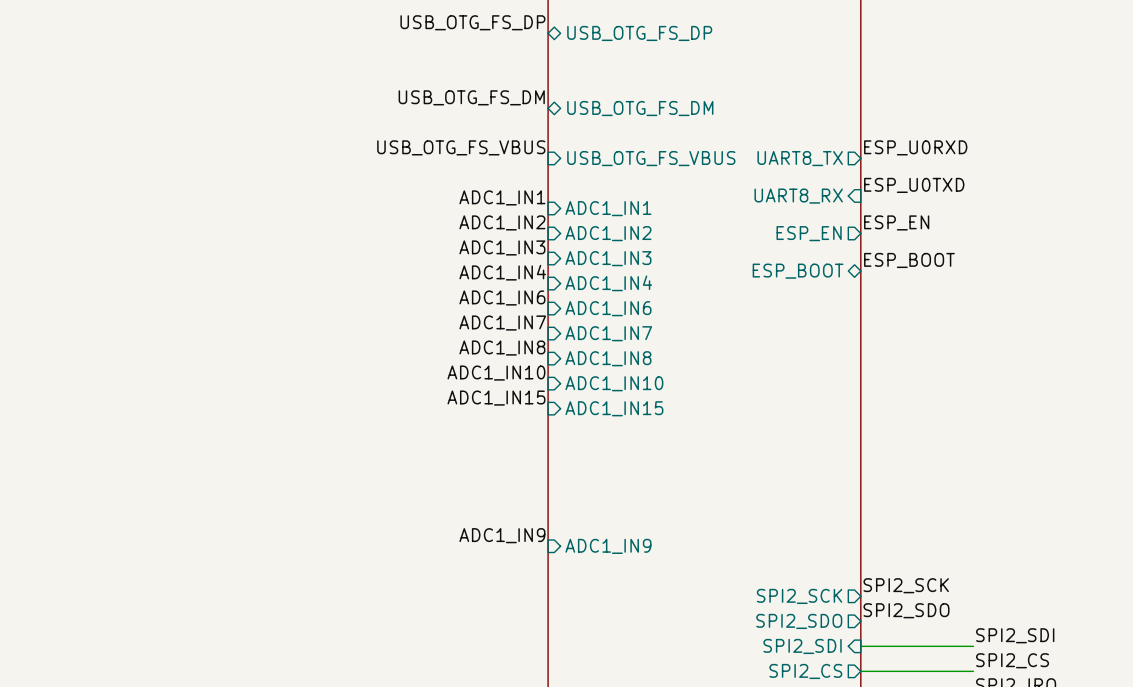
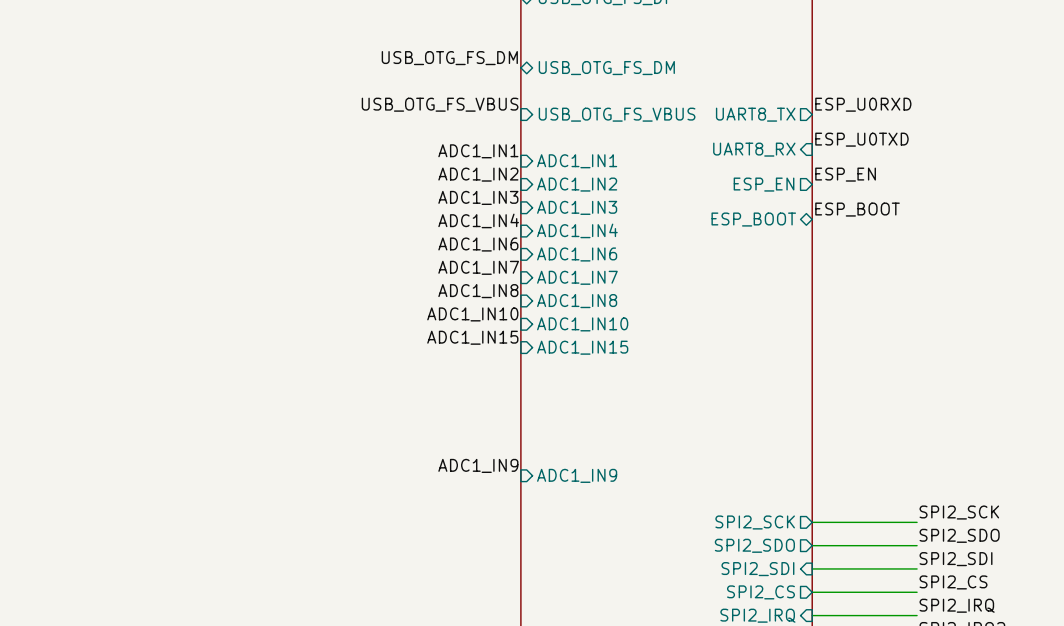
label position: SPI2_SCK (906, 585) -> SPI2_SCK (959, 512)
wire: none -> (812, 522) (917, 522)
label position: SPI2_SDO (906, 610) -> SPI2_SDO (959, 535)
wire: none -> (812, 545) (917, 545)

